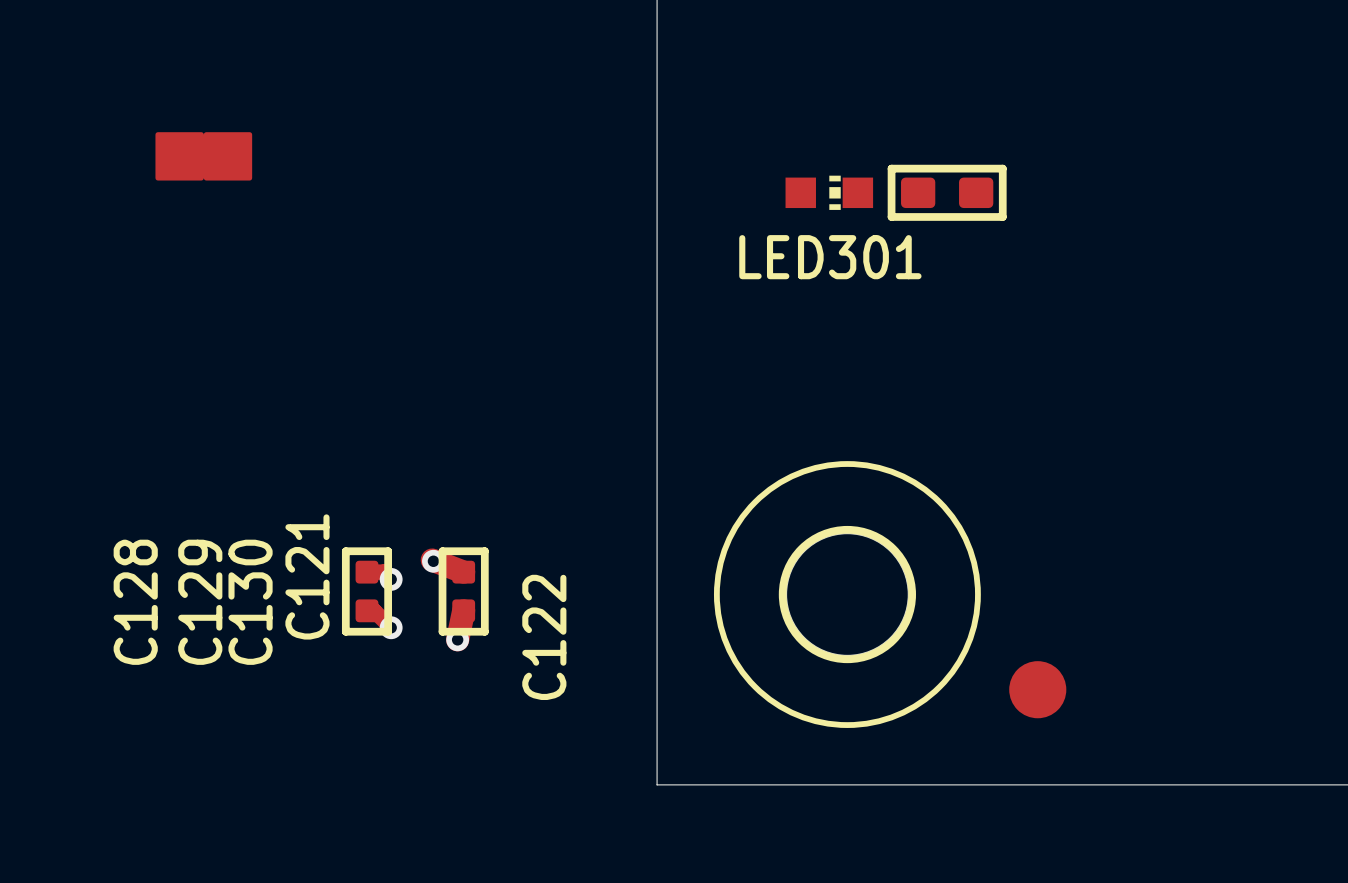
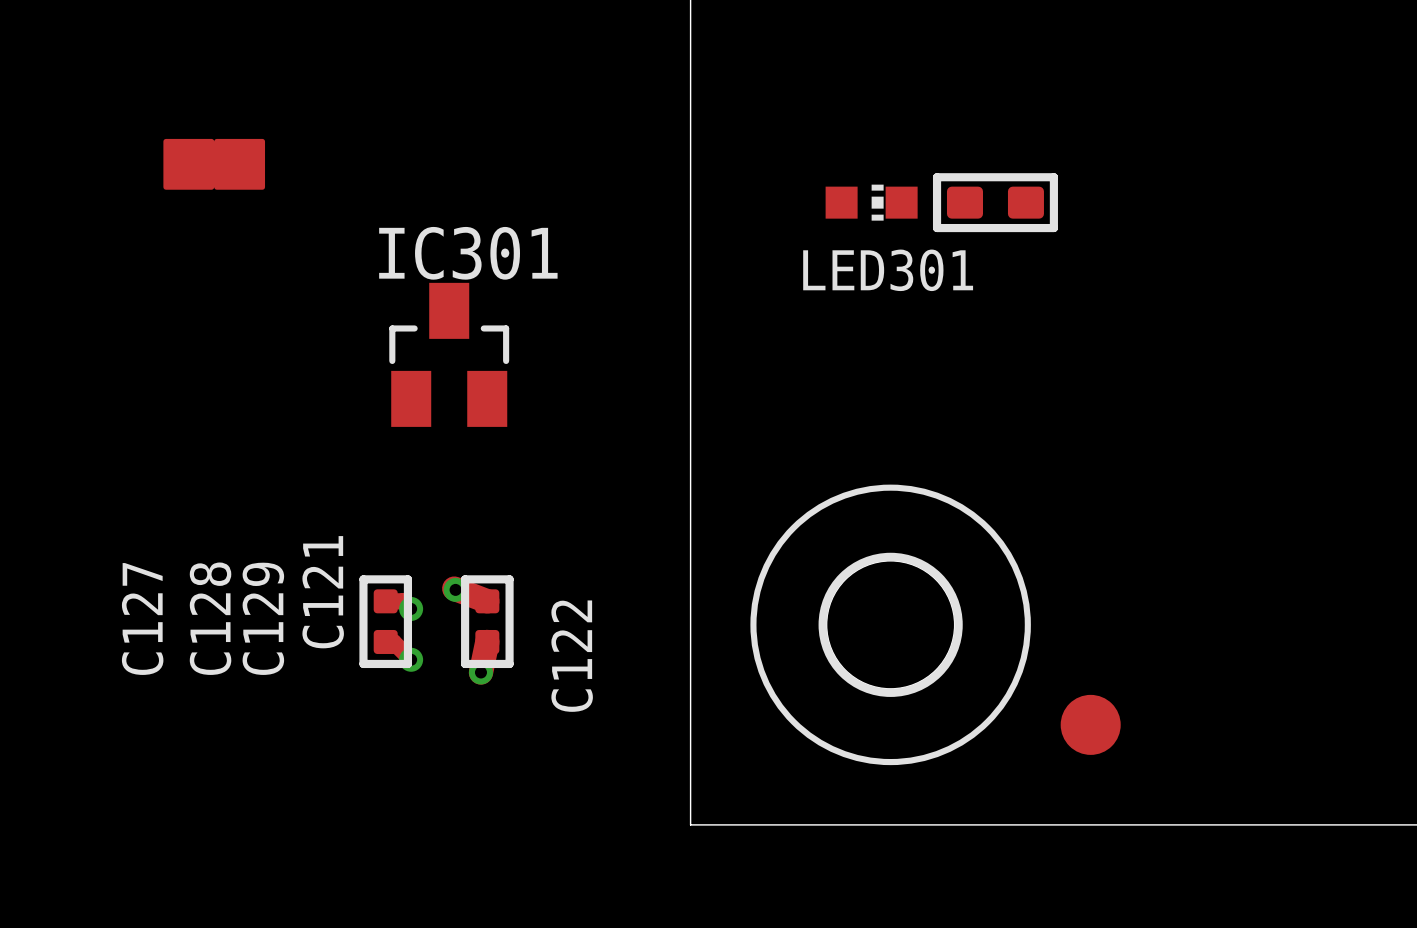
IC301: none -> (449, 354)
C128 name: C128 (135, 602) -> C127 (142, 619)
C129 name: C129 (200, 602) -> C128 (210, 618)
C130 name: C130 (250, 602) -> C129 (263, 618)

